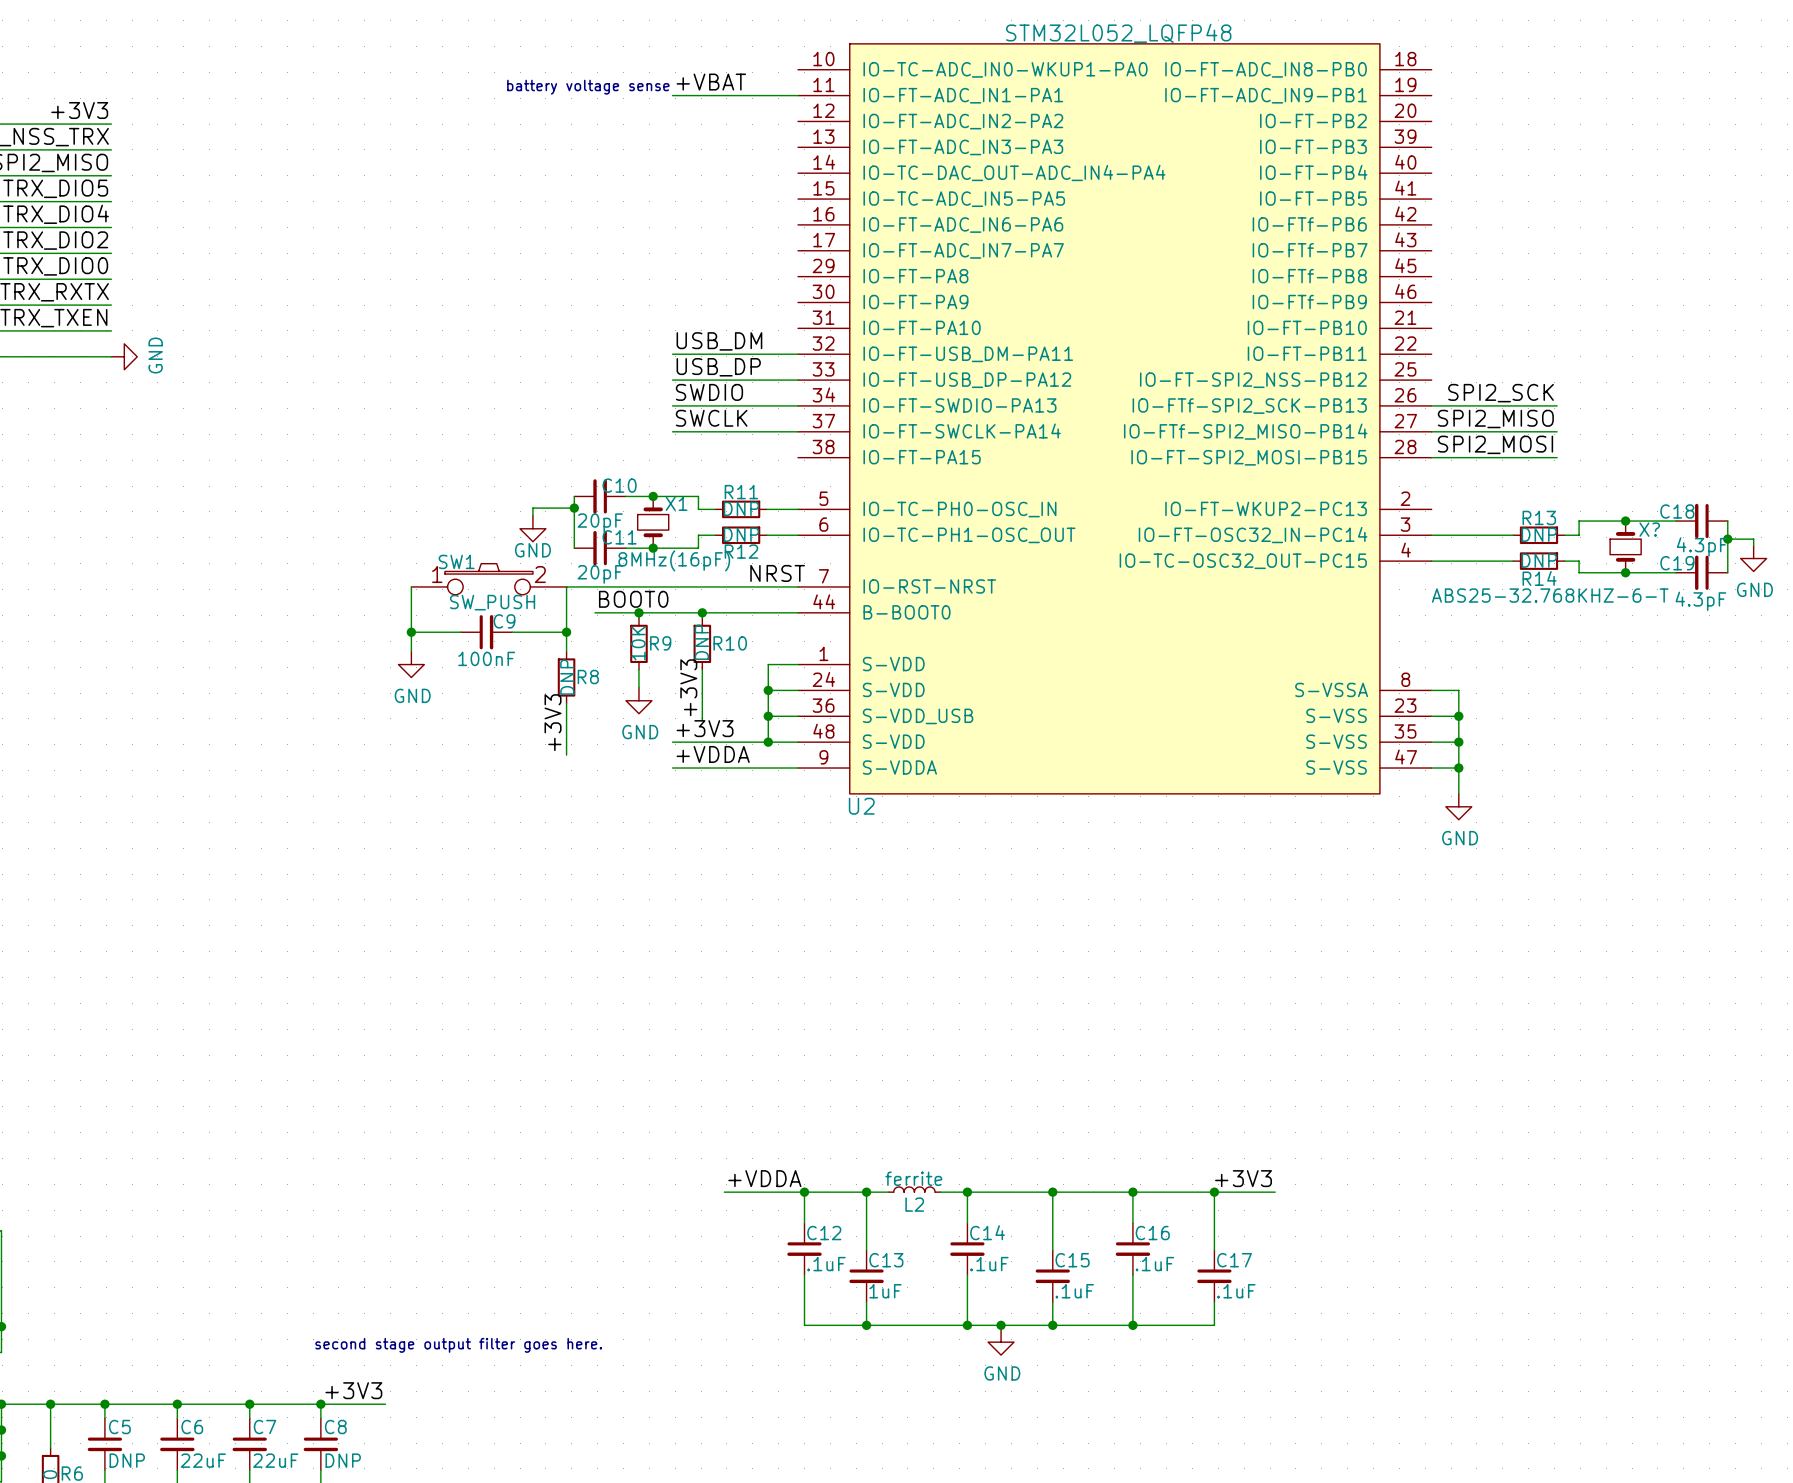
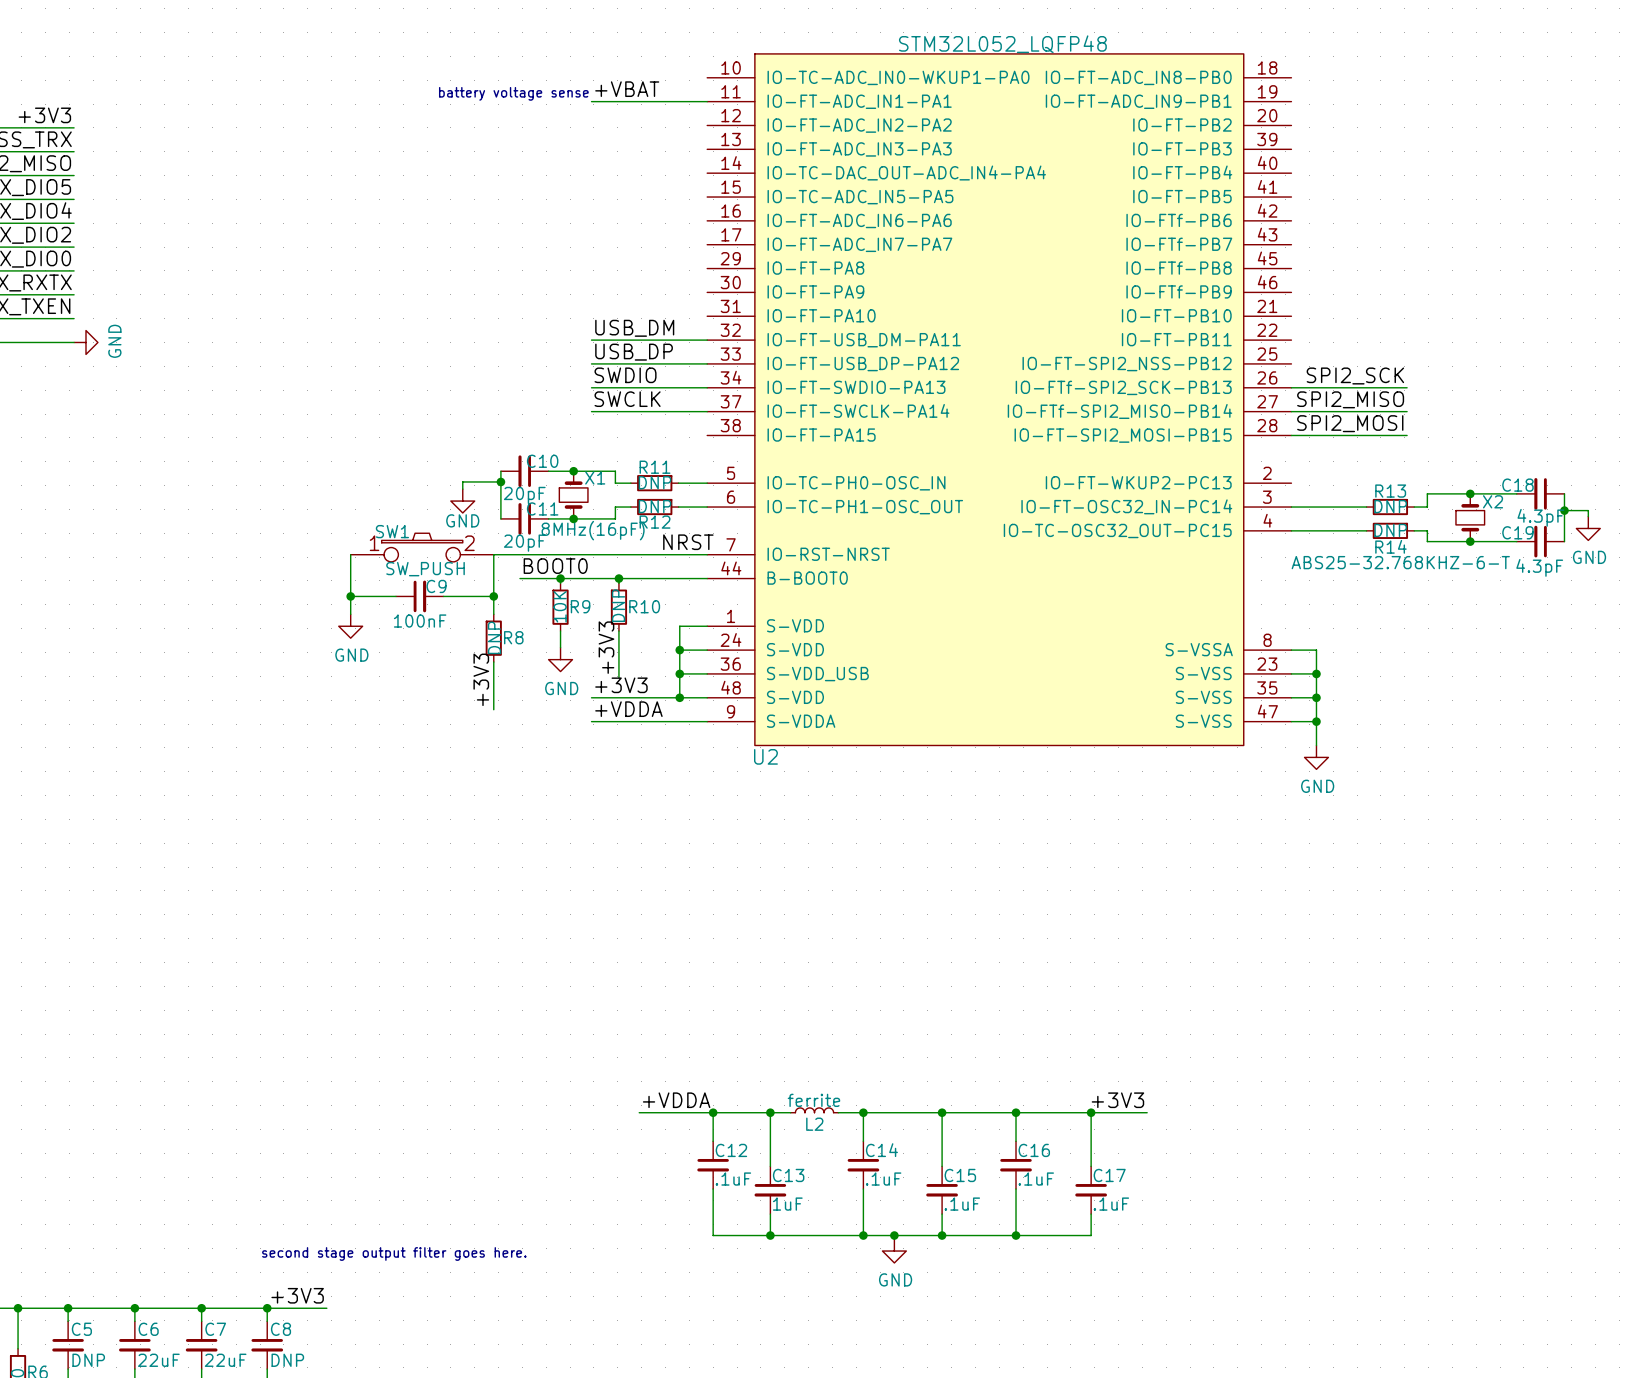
X? name: X? (1649, 529) -> X2 (1493, 501)

